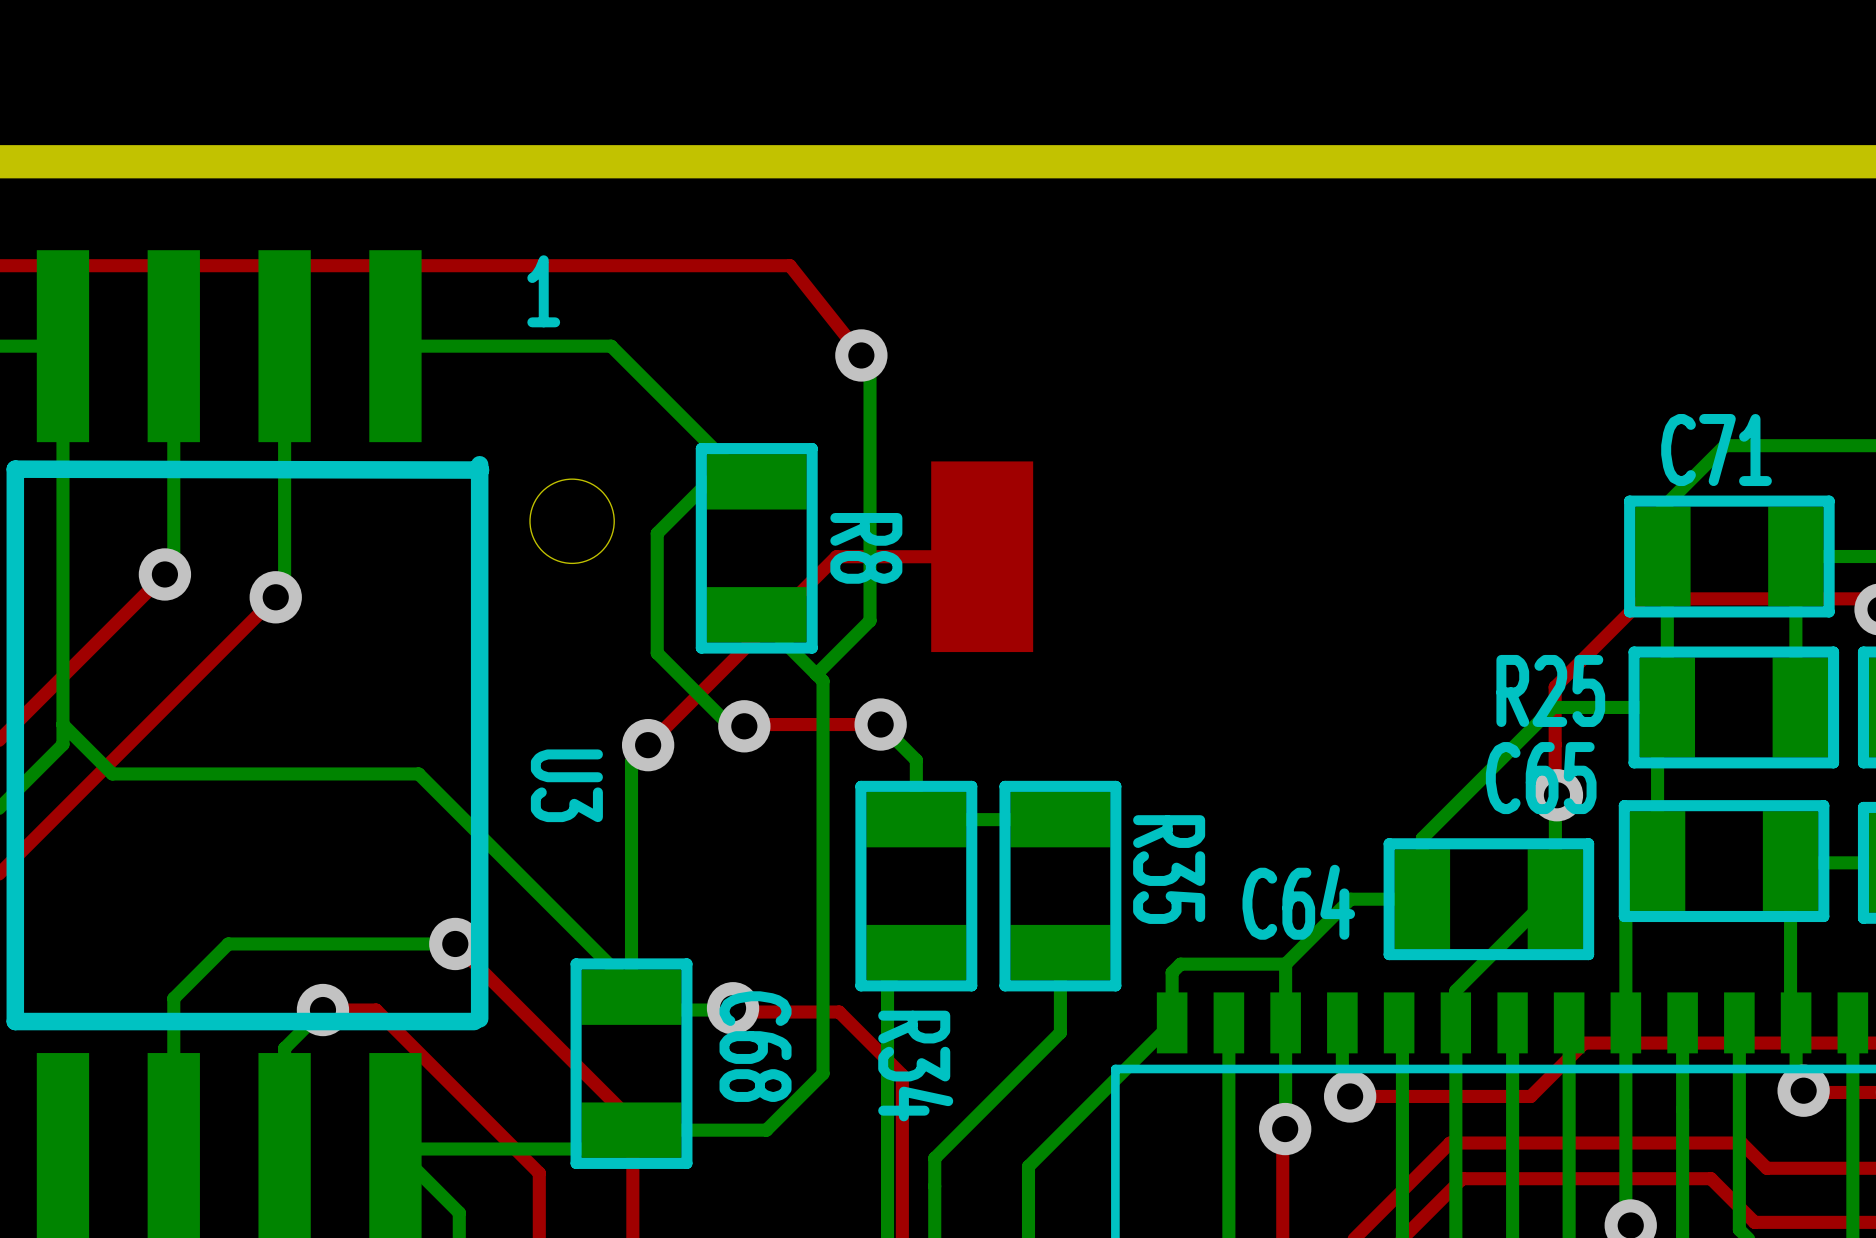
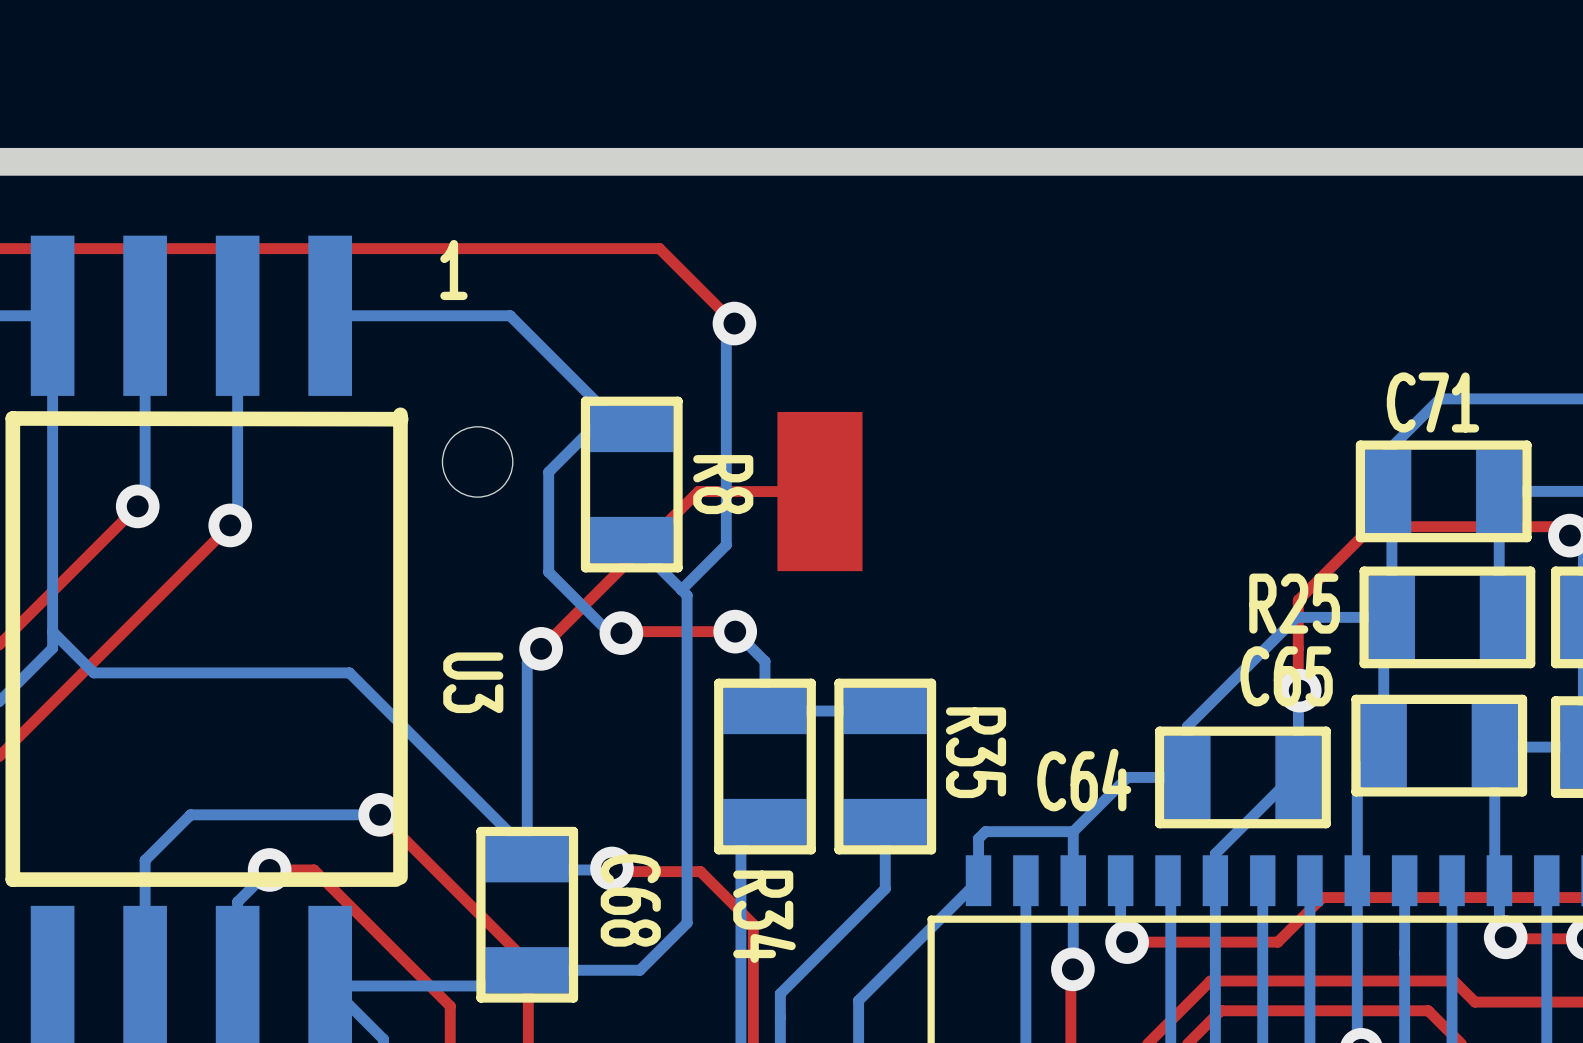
top track: (790, 265) (861, 355) -> (659, 248) (734, 323)
via position: (861, 355) -> (734, 323)

